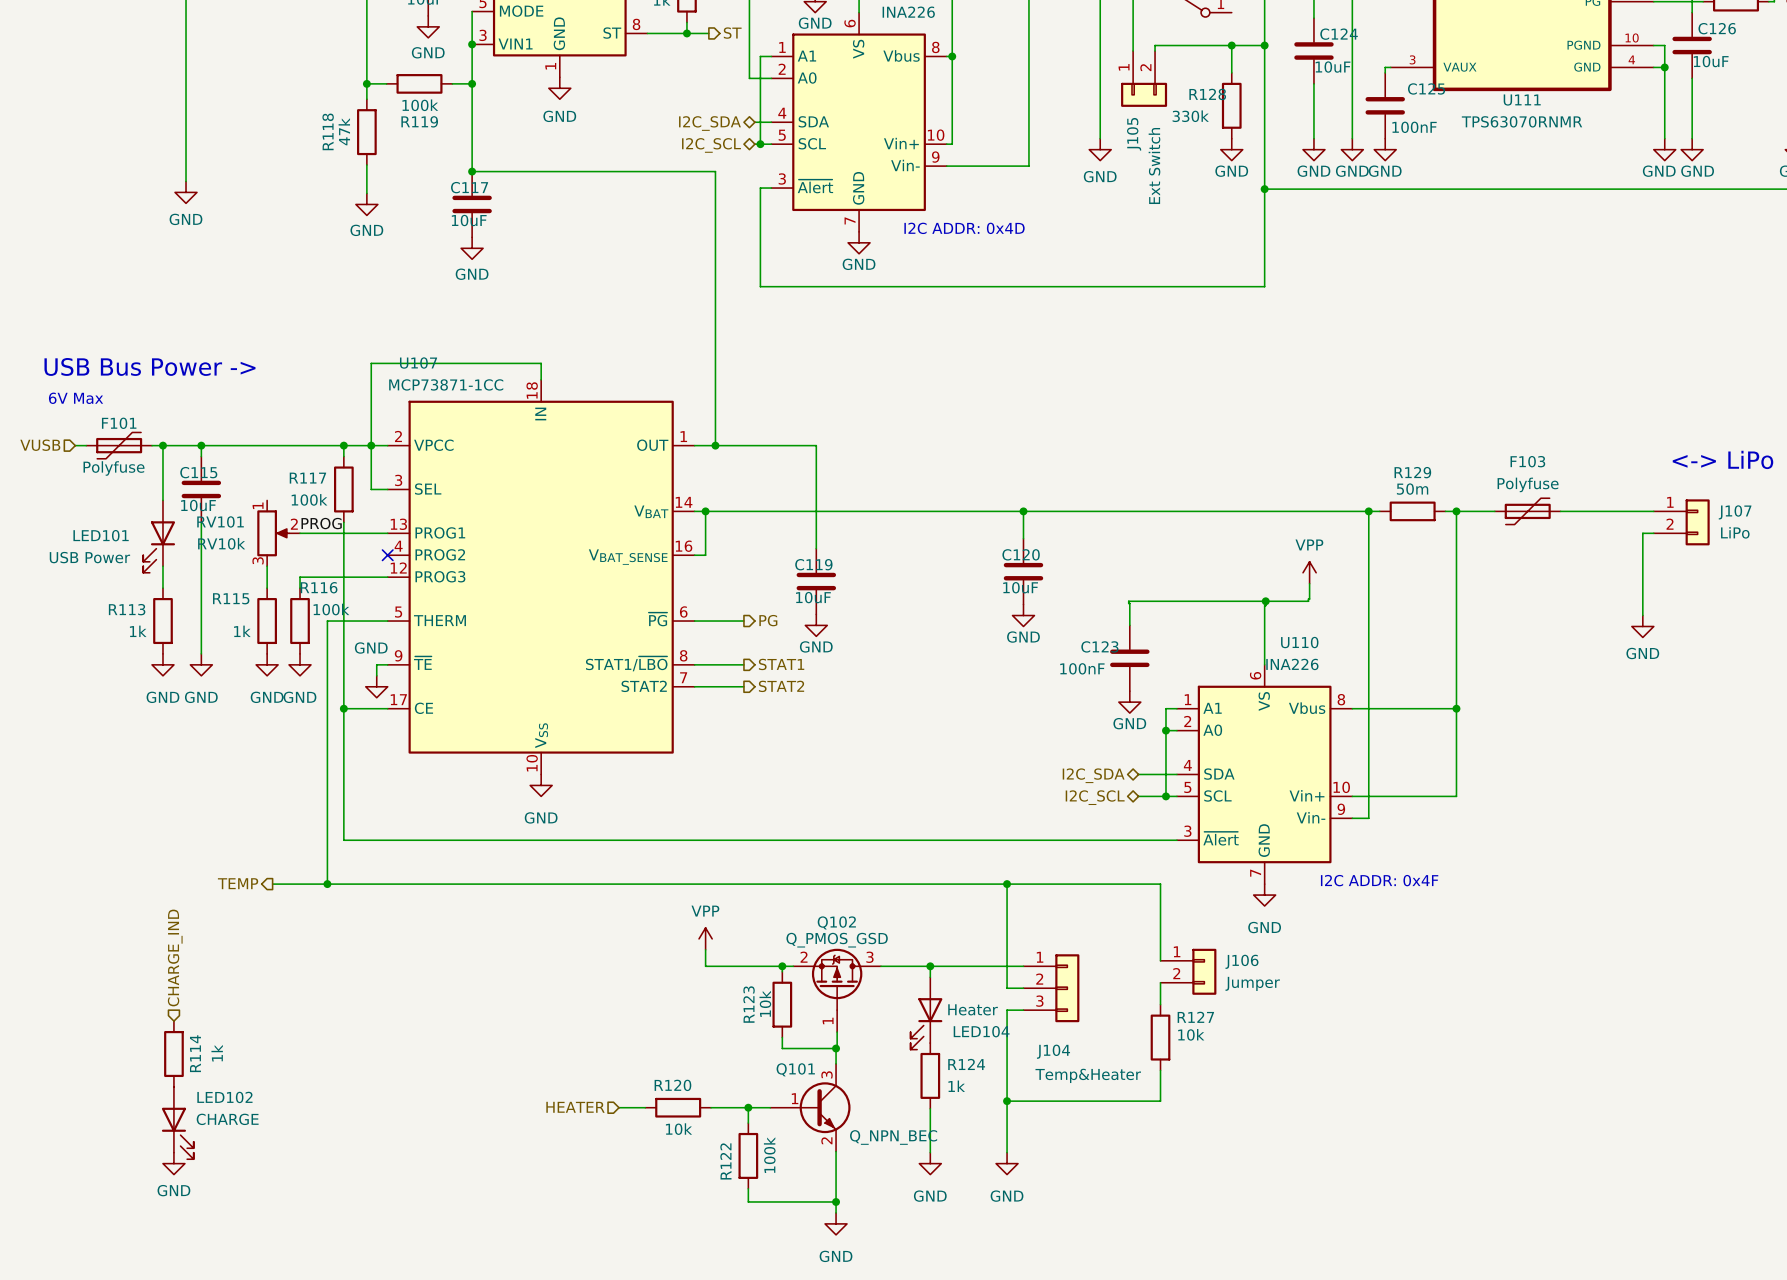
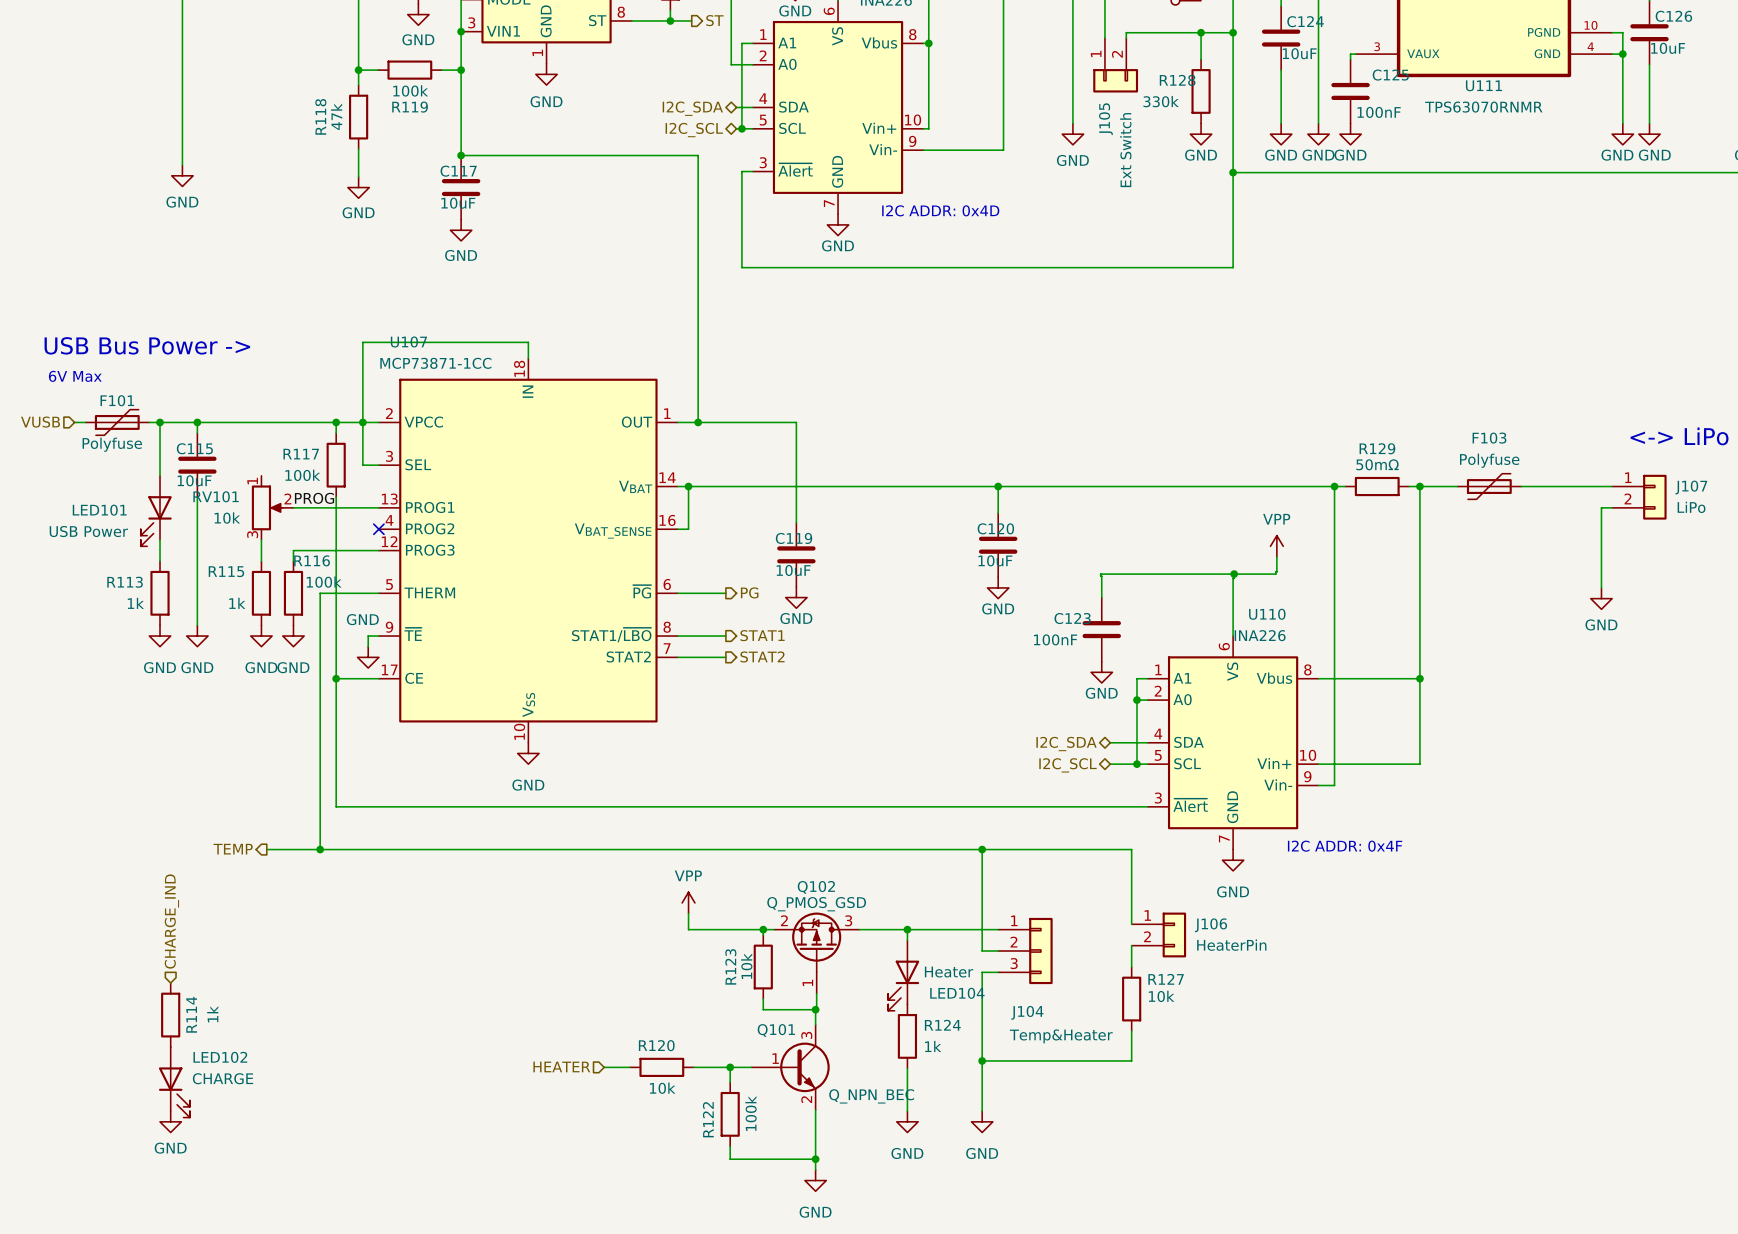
R129 value: 50m (1412, 489) -> 50mΩ (1377, 464)
RV101 value: RV10k (221, 543) -> 10k (227, 518)
J106 value: Jumper (1252, 983) -> HeaterPin (1231, 945)

